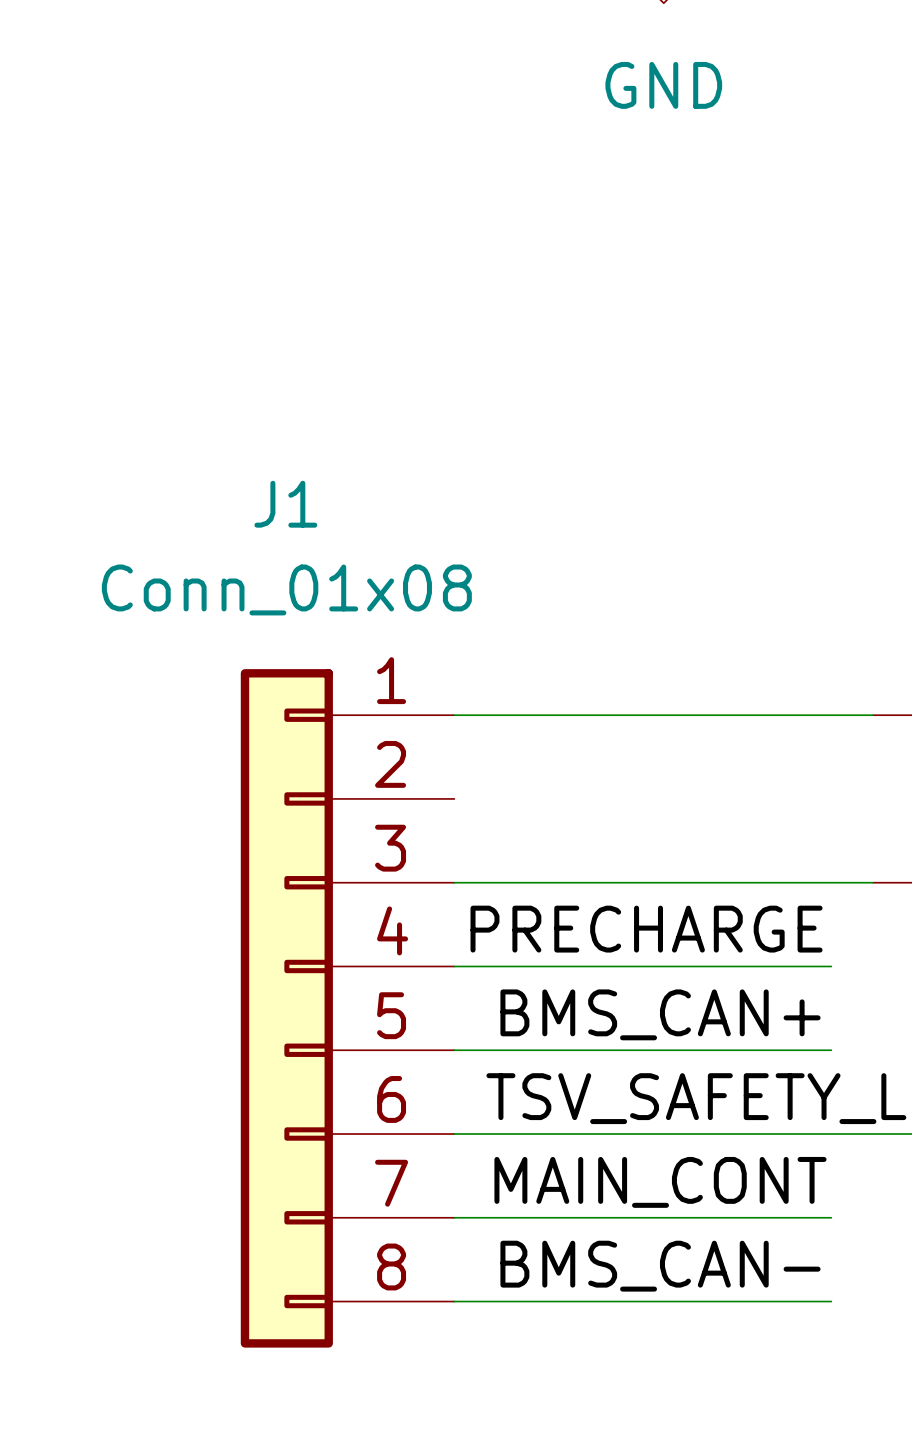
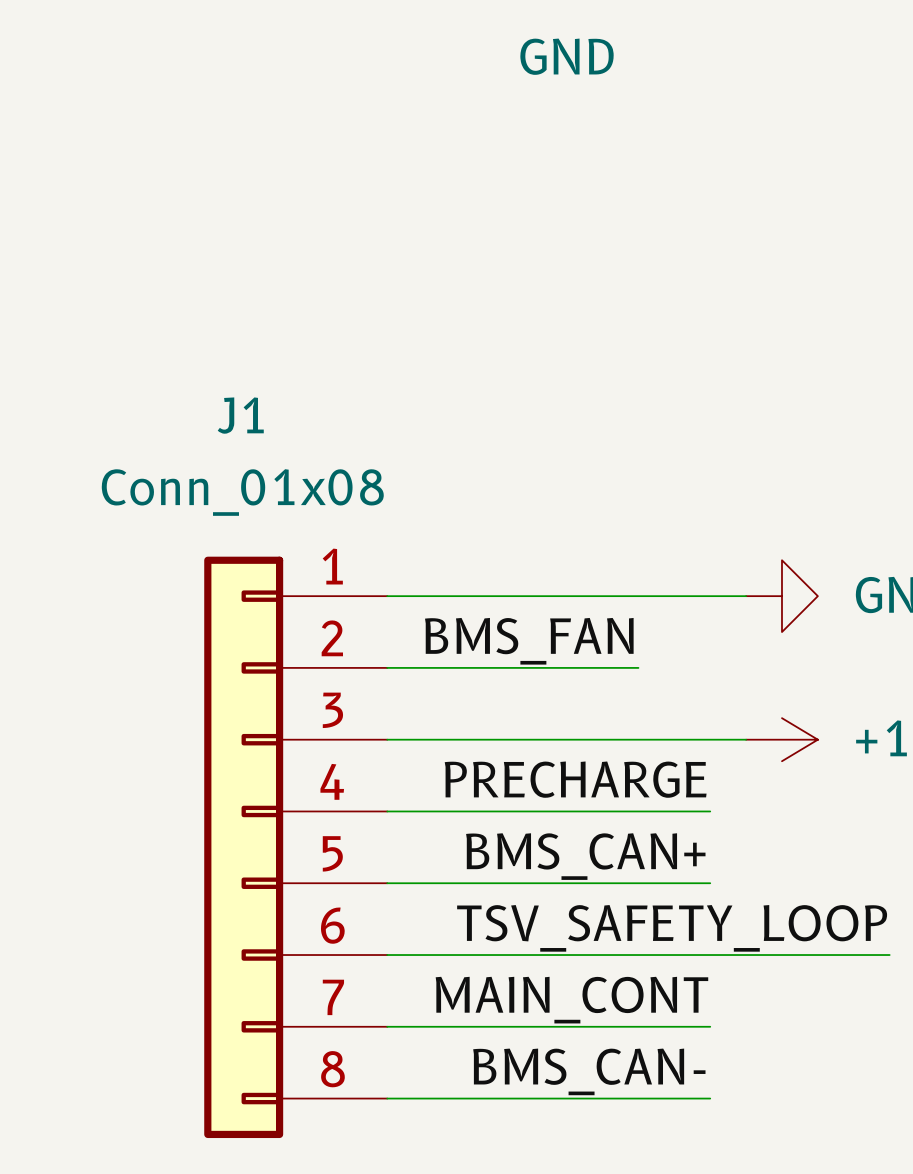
label: none -> BMS_FAN (529, 641)
wire: none -> (387, 667) (638, 667)

